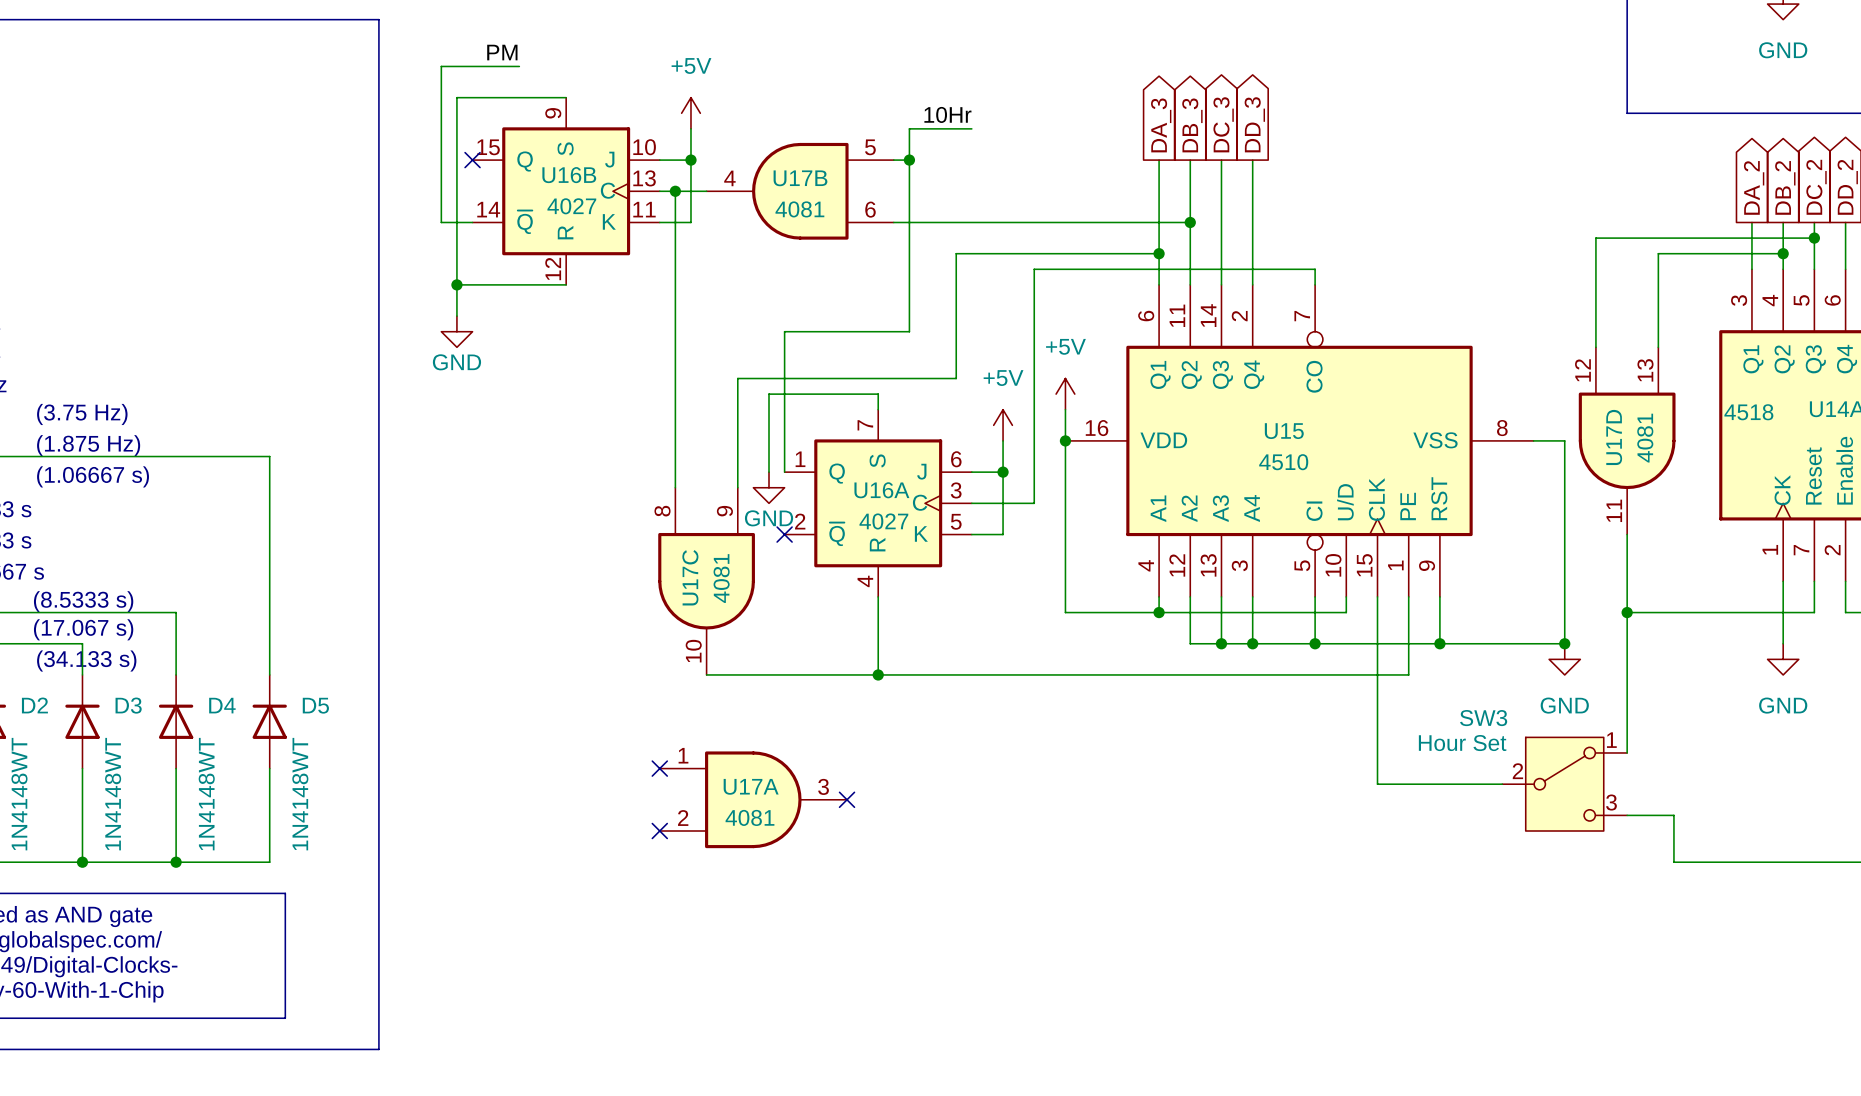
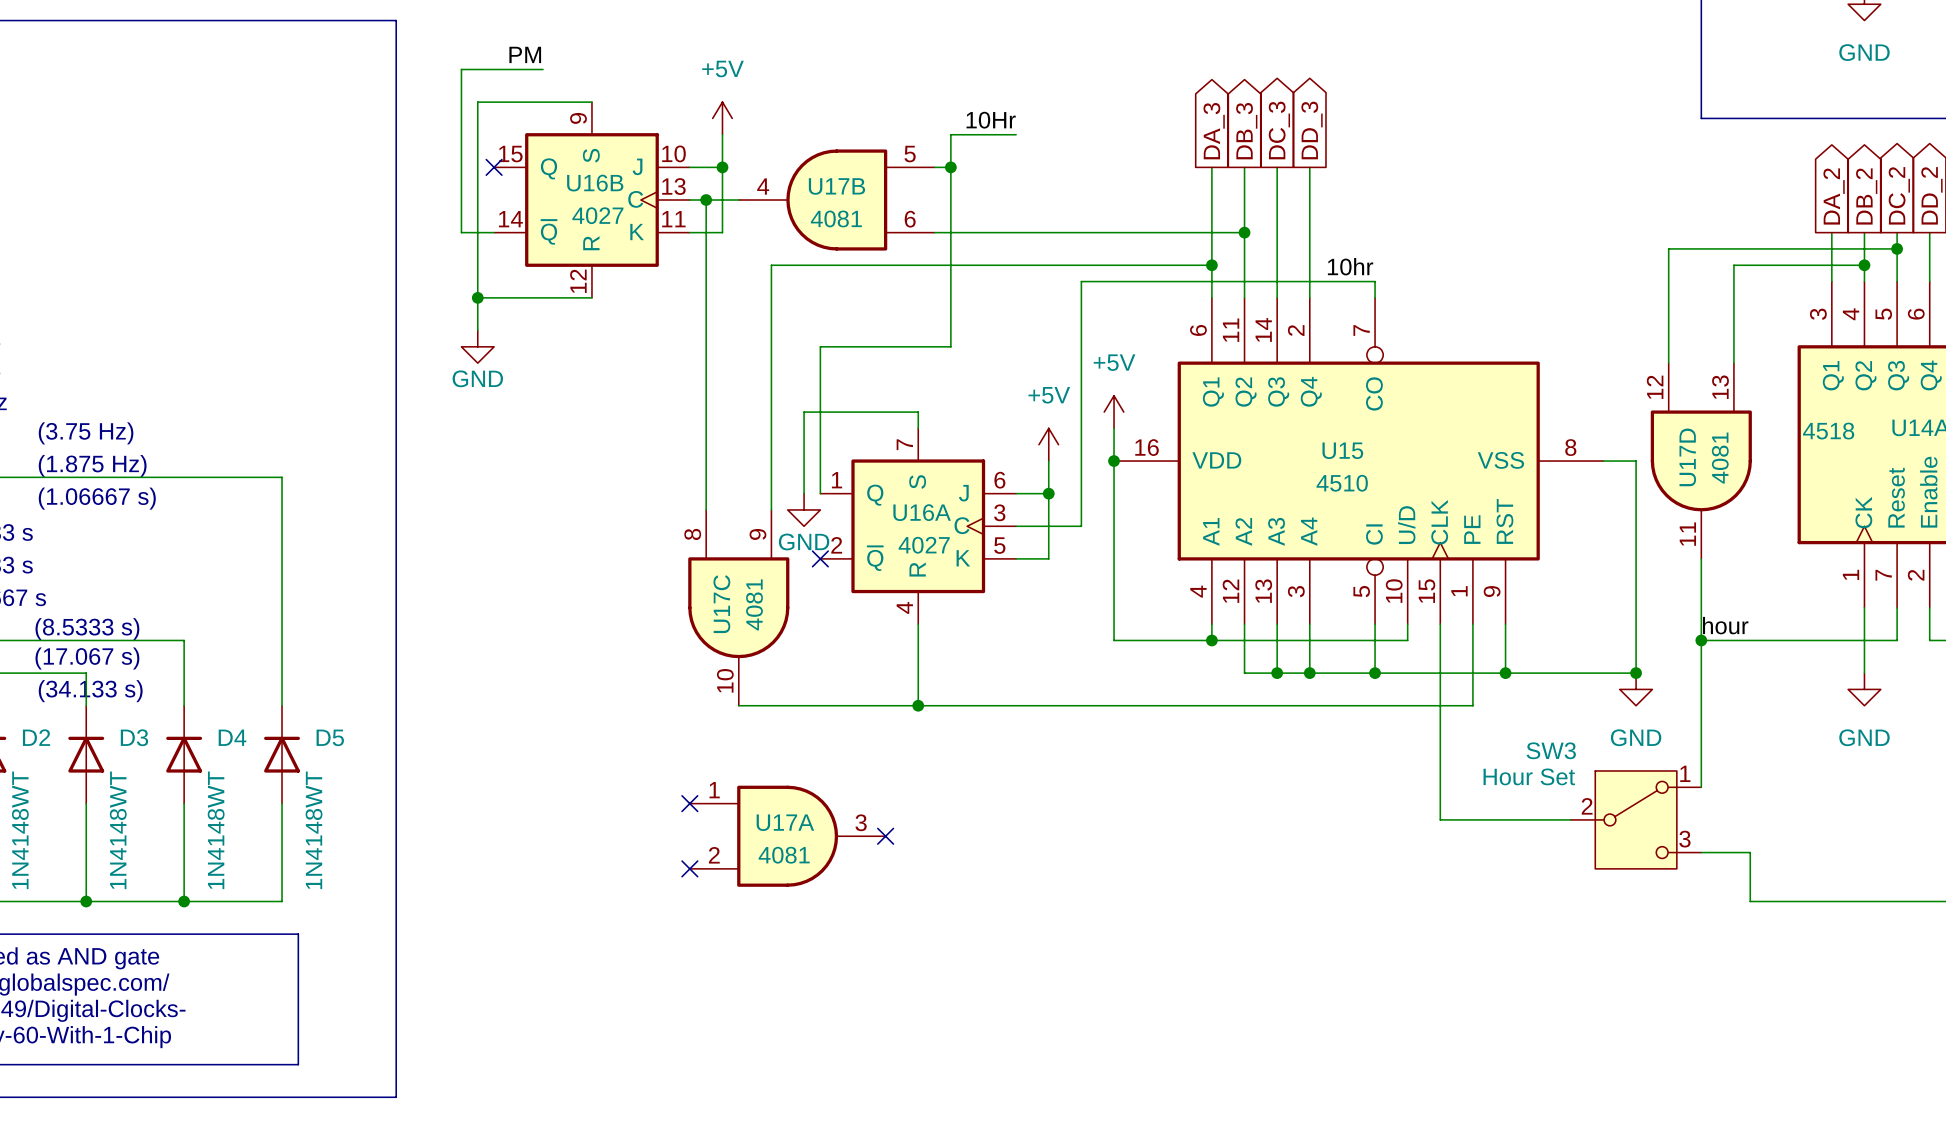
wire: (956, 253) (956, 378) (737, 378) -> (999, 265) (771, 265) (771, 395)
label: none -> 10hr (1350, 266)
label: none -> hour (1725, 625)

